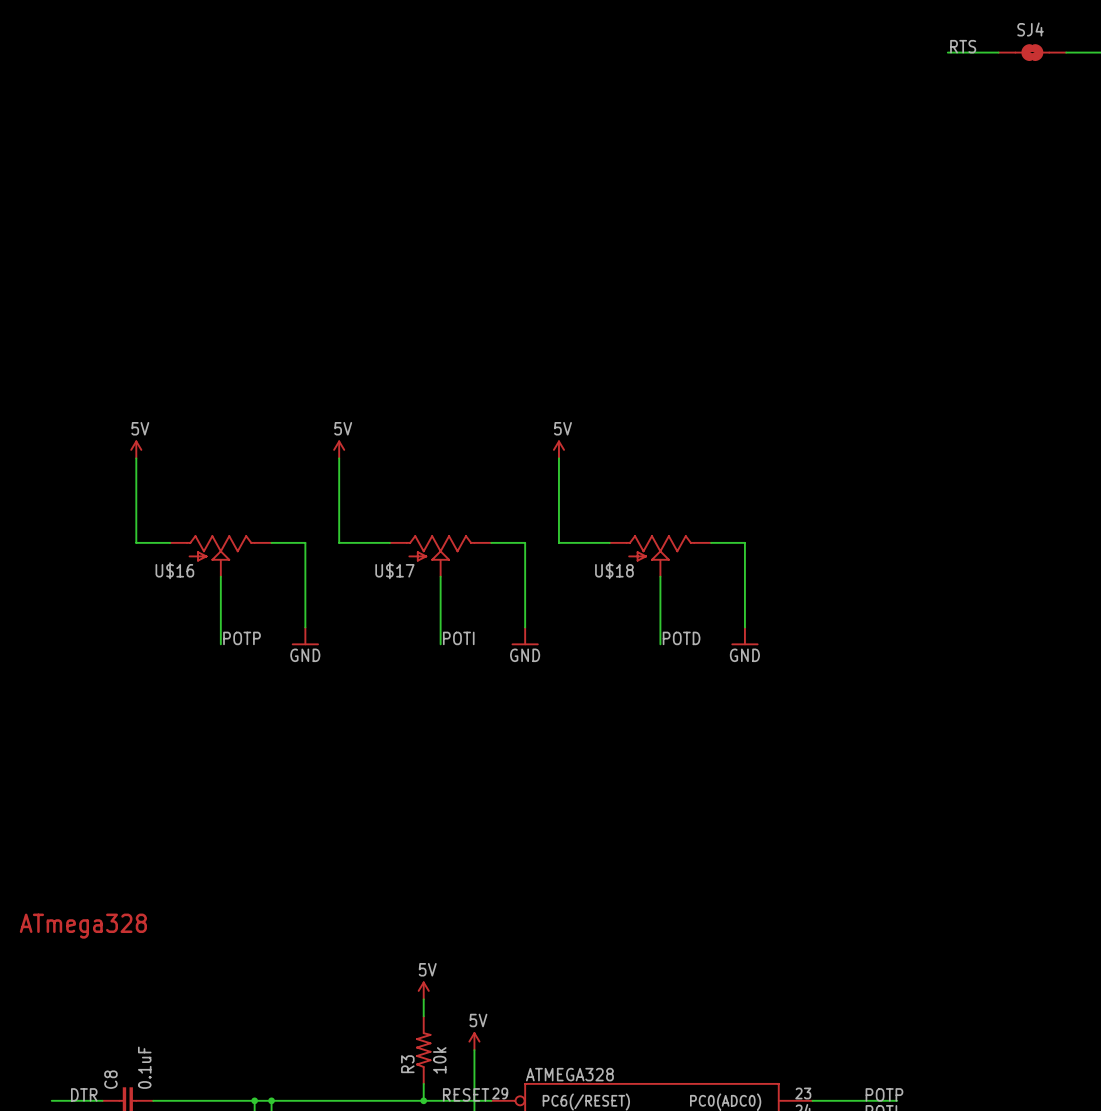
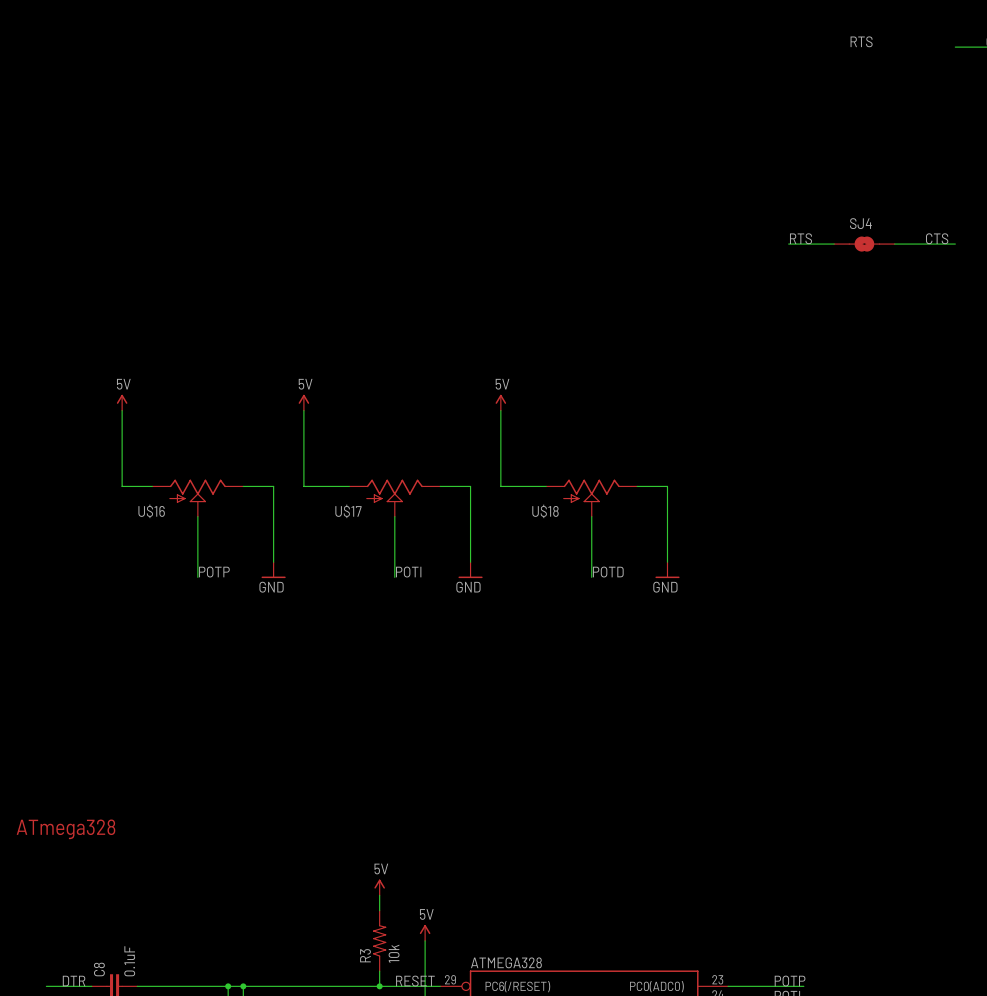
wire: (947, 52) (998, 52) -> none
SJ4 position: (1032, 52) -> (864, 244)
label: none -> RTS (800, 238)
label: none -> CTS (937, 238)
wire: none -> (788, 244) (834, 244)
wire: none -> (894, 244) (955, 244)

